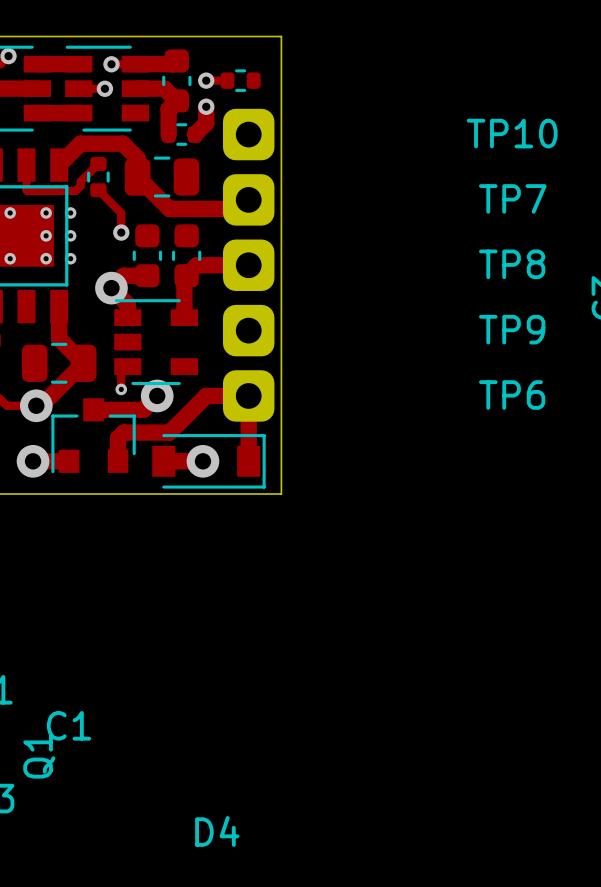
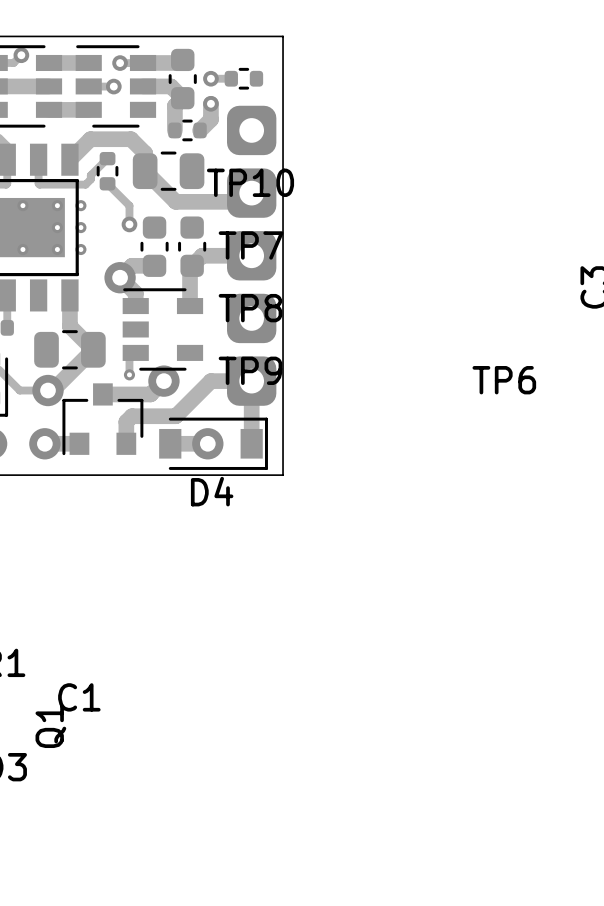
TP10 name position: TP10 (512, 133) -> TP10 (250, 182)
TP7 name position: TP7 (512, 198) -> TP7 (251, 245)
TP8 name position: TP8 (512, 264) -> TP8 (250, 308)
TP9 name position: TP9 (512, 329) -> TP9 (250, 370)
D4 name position: D4 (217, 831) -> D4 (212, 491)

